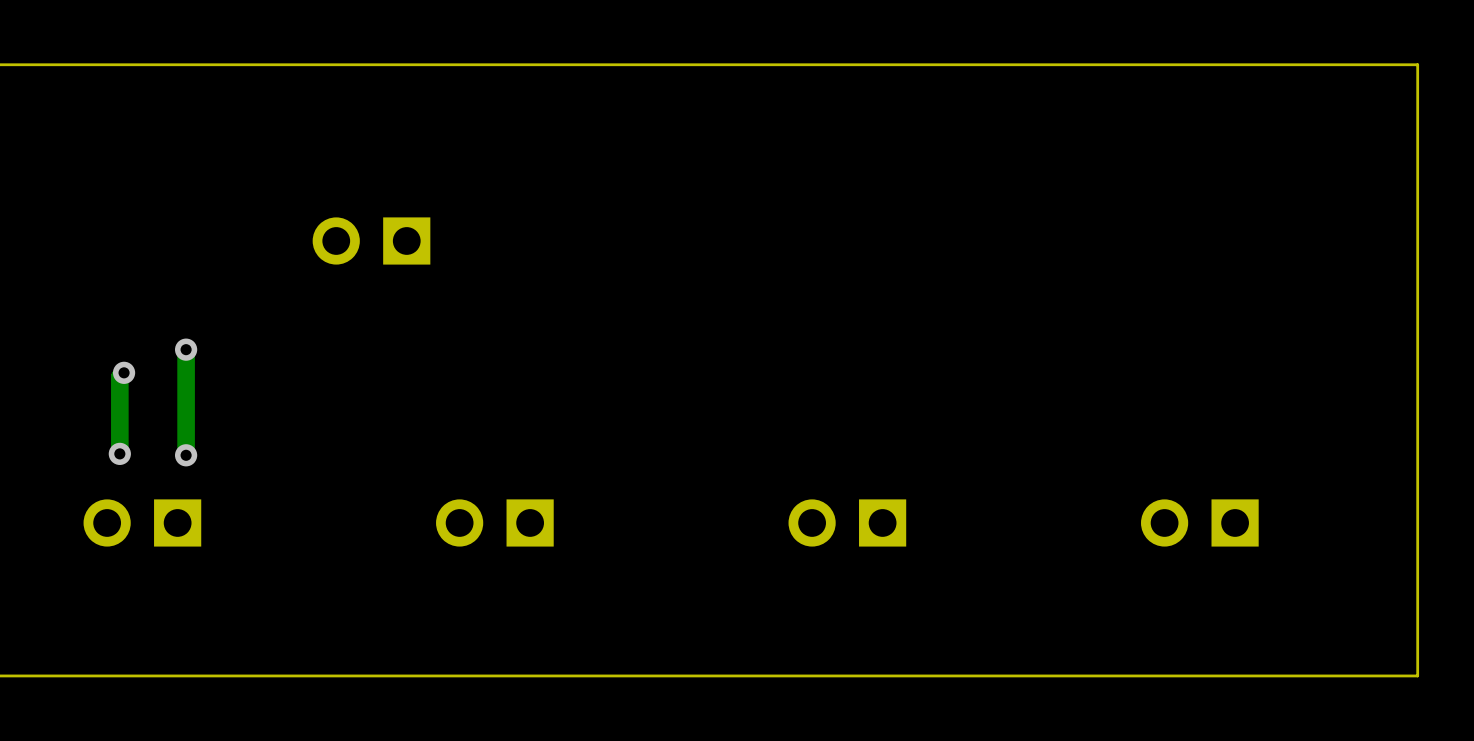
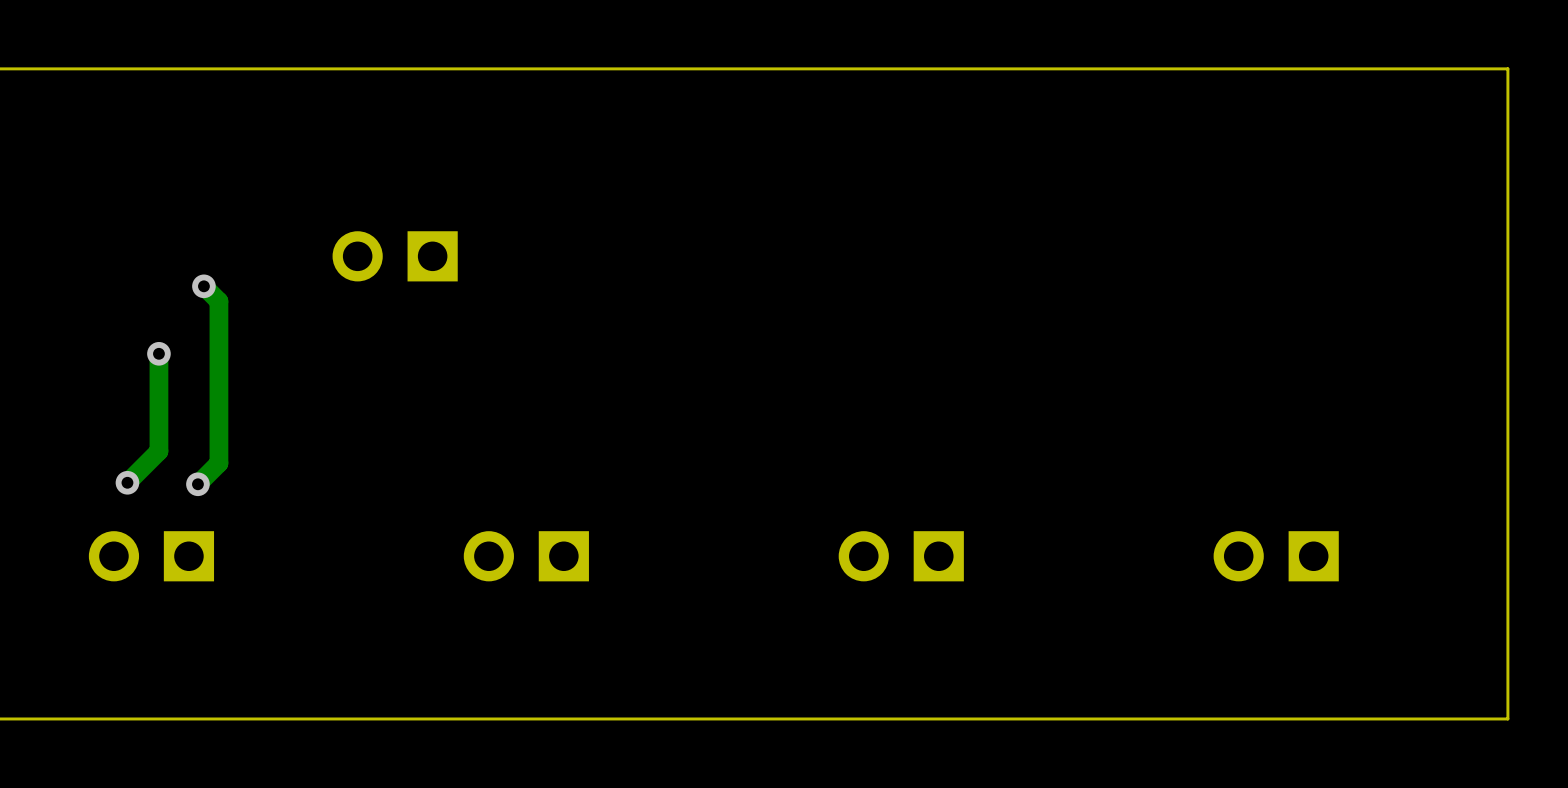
via: none -> (203, 286)
via: none -> (158, 353)
track: (186, 349) (186, 455) -> (203, 286) (218, 301) (218, 463) (197, 484)
via: (186, 349) -> none
track: (124, 372) (119, 377) (119, 453) -> (158, 353) (158, 451) (127, 482)
via: (124, 372) -> none

